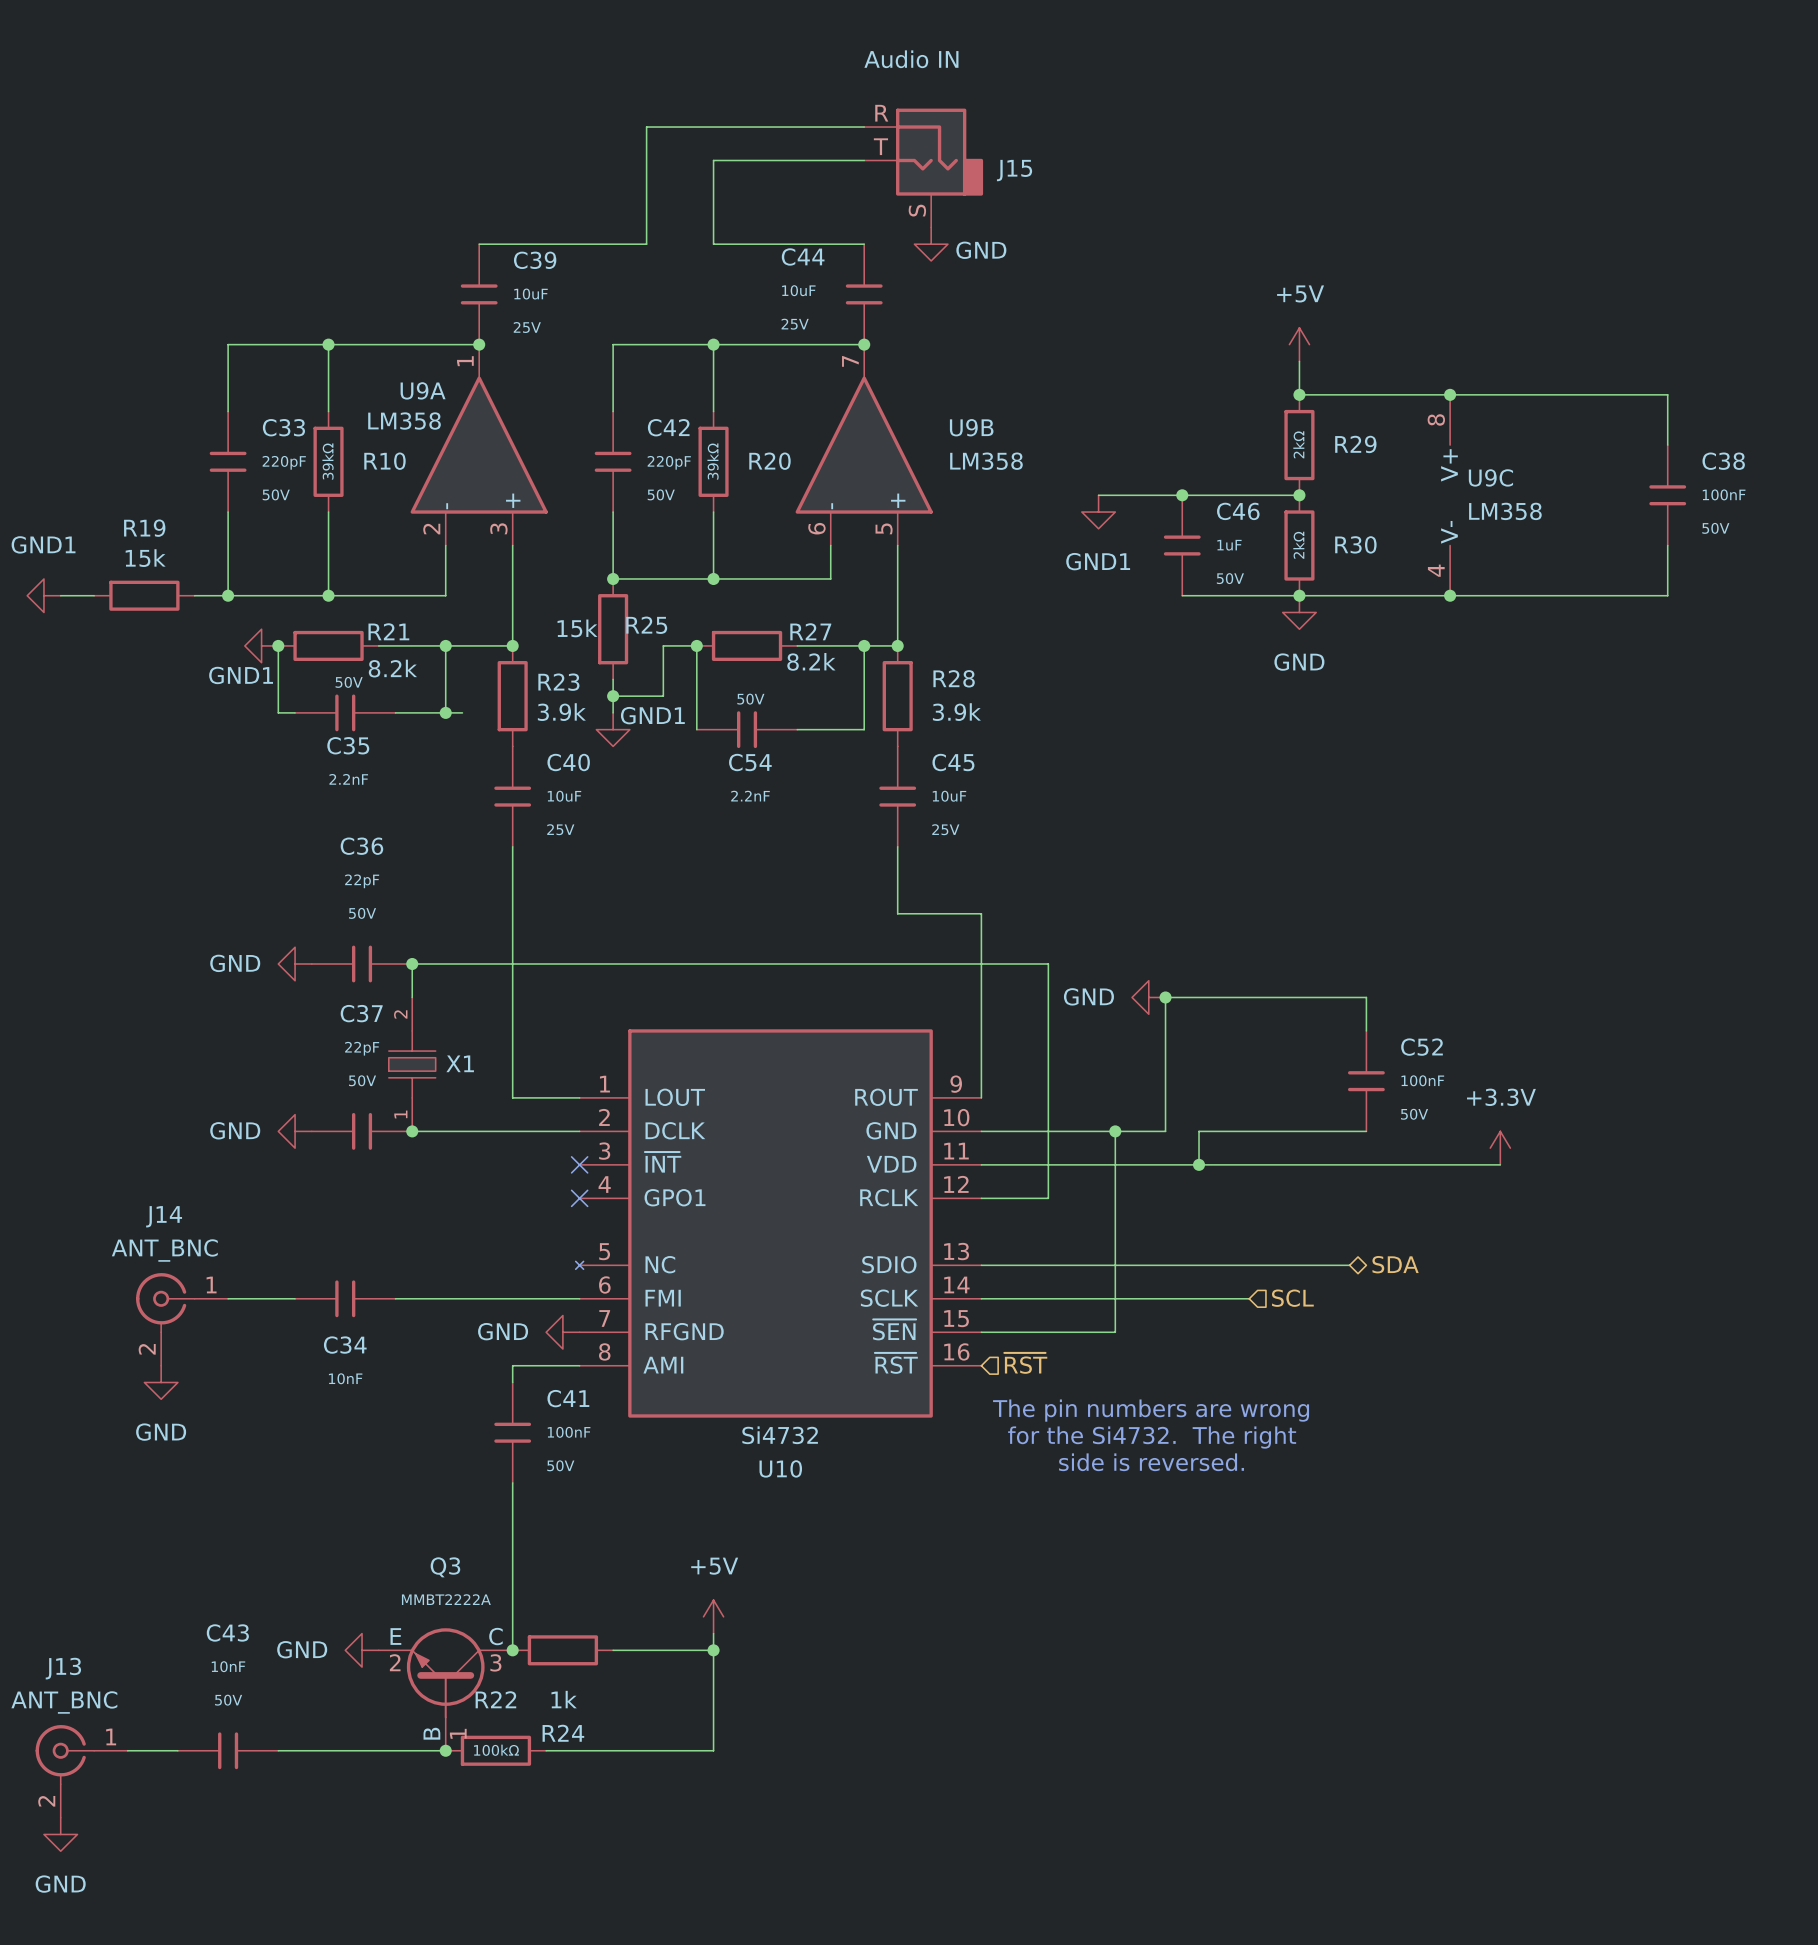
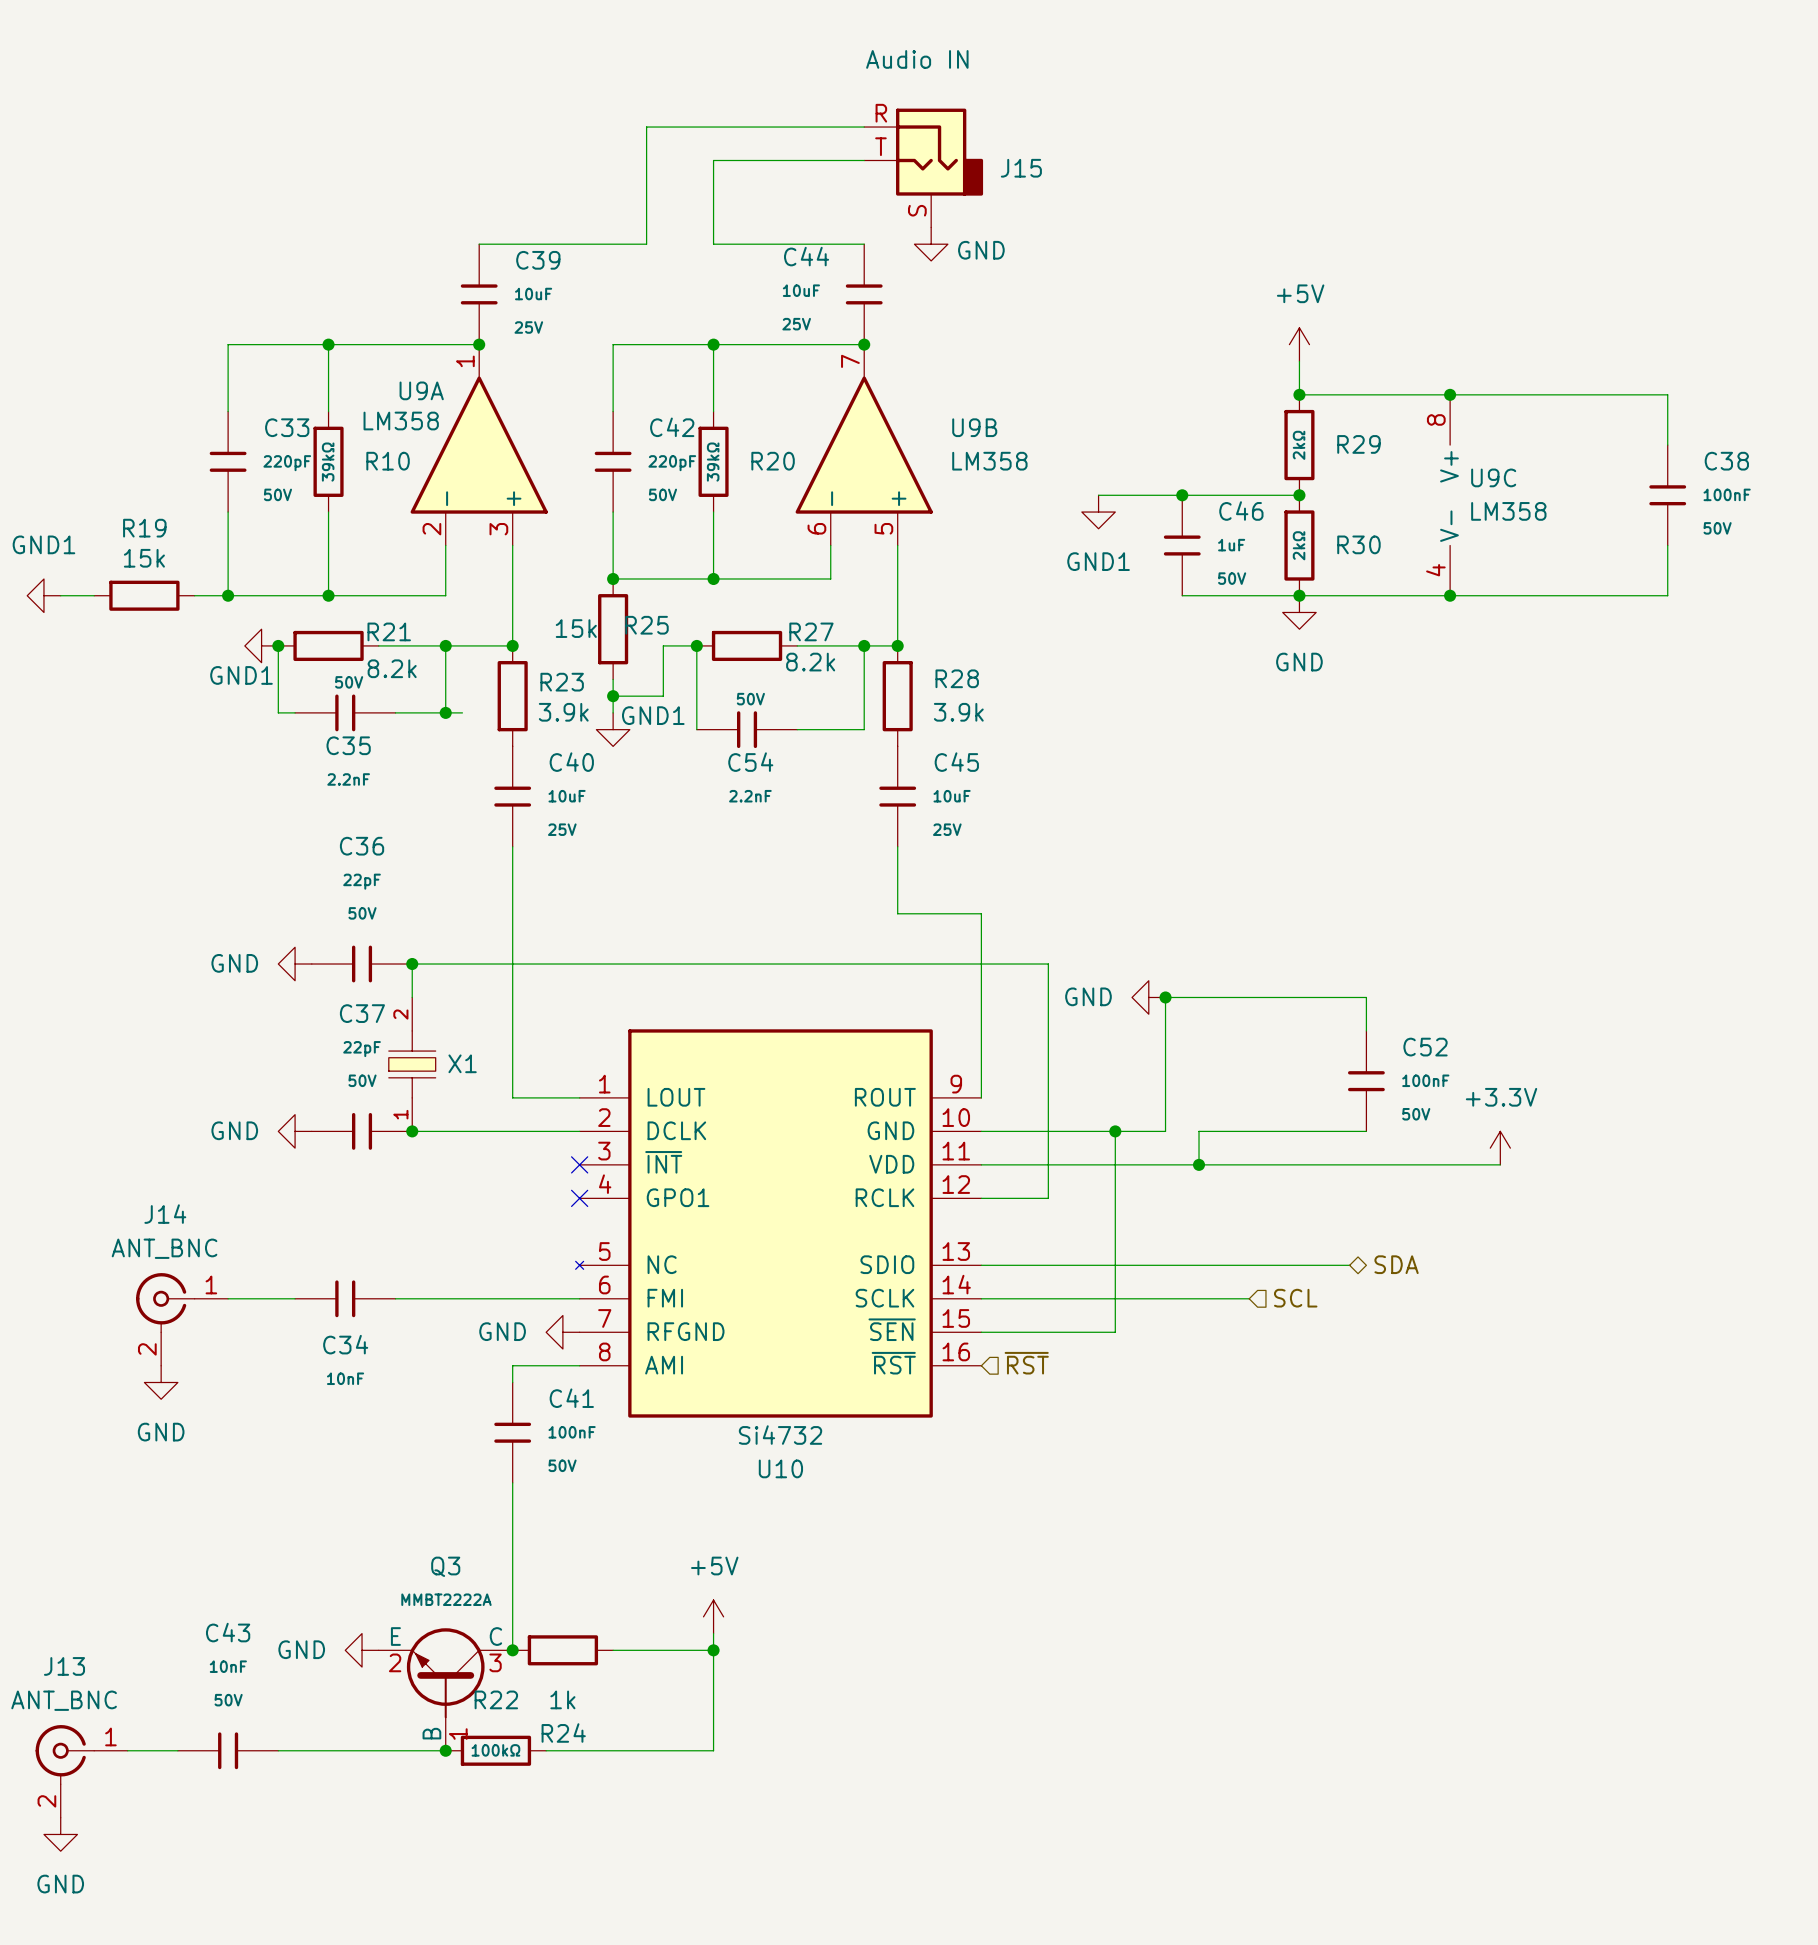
text: The pin numbers are wrong (1151, 1410) -> none
text: for the Si4732. The right (1152, 1437) -> none
text: side is reversed. (1151, 1462) -> none

